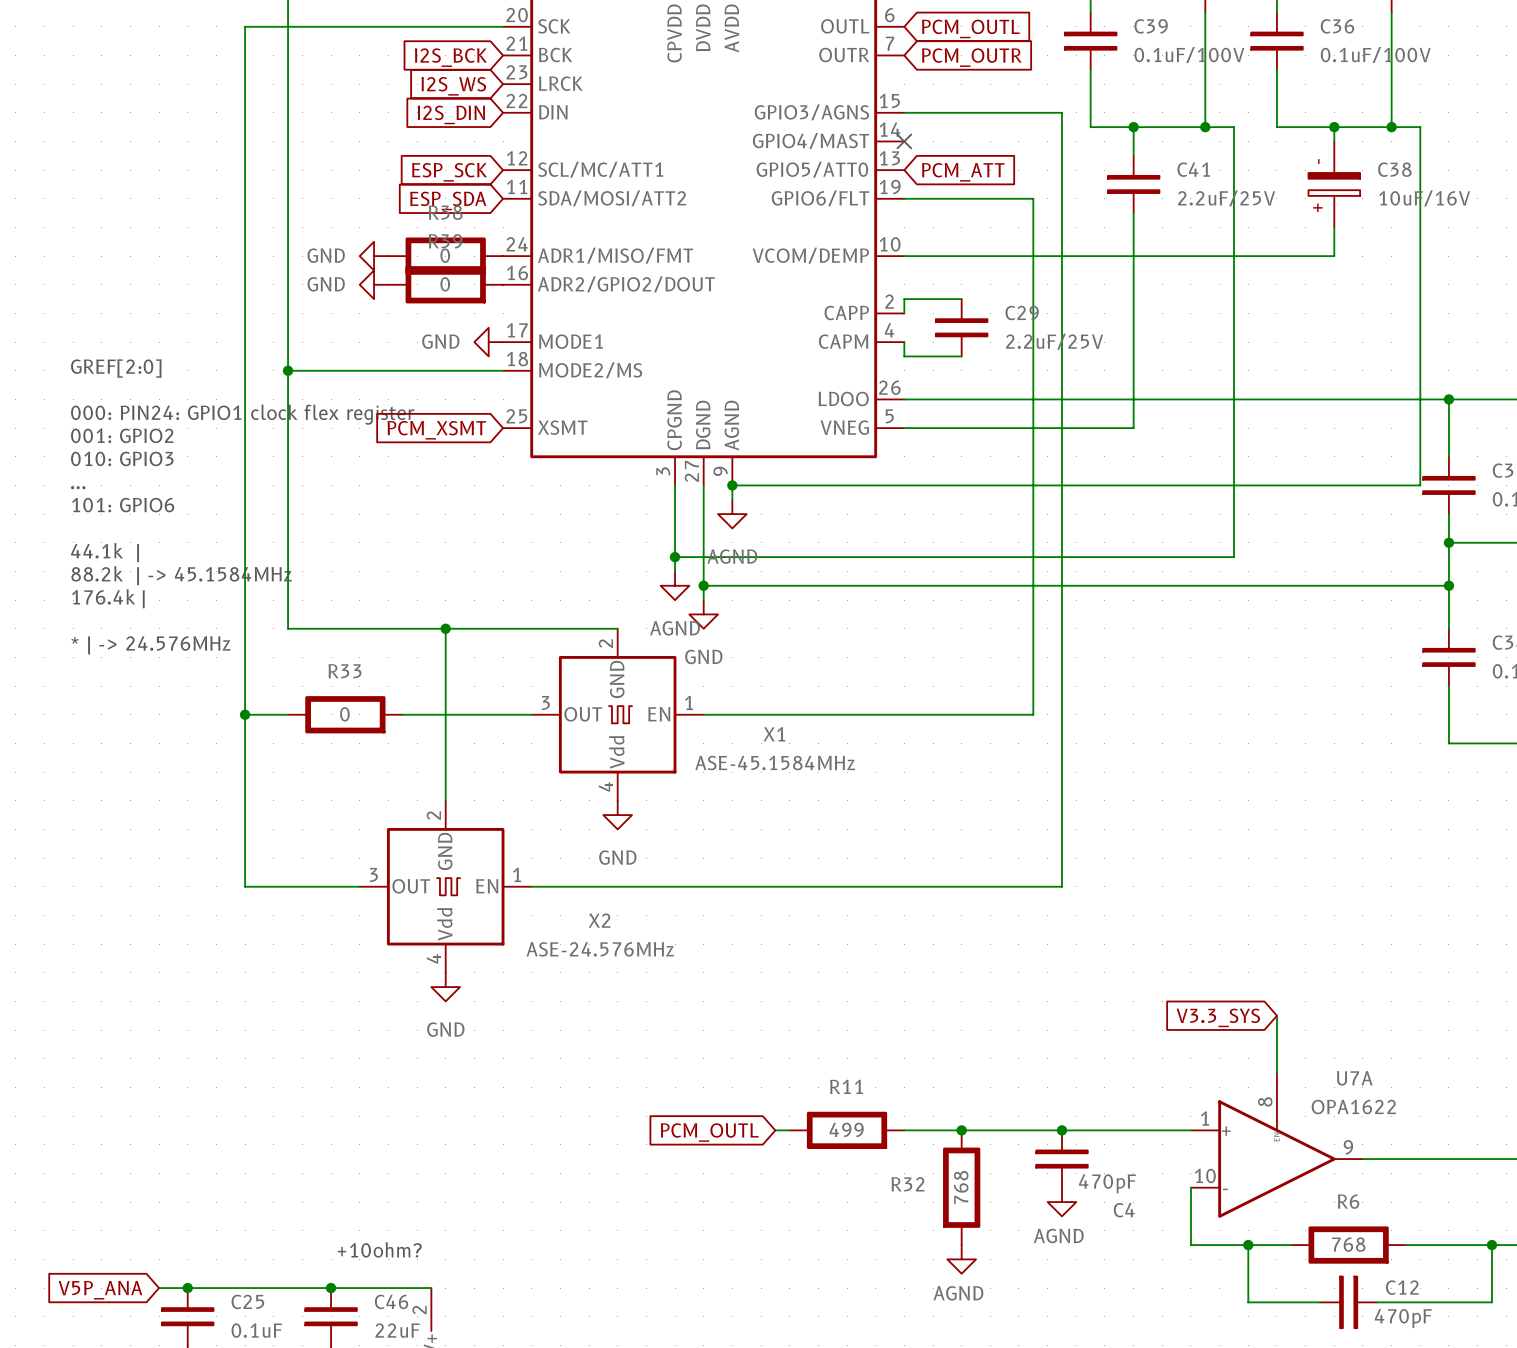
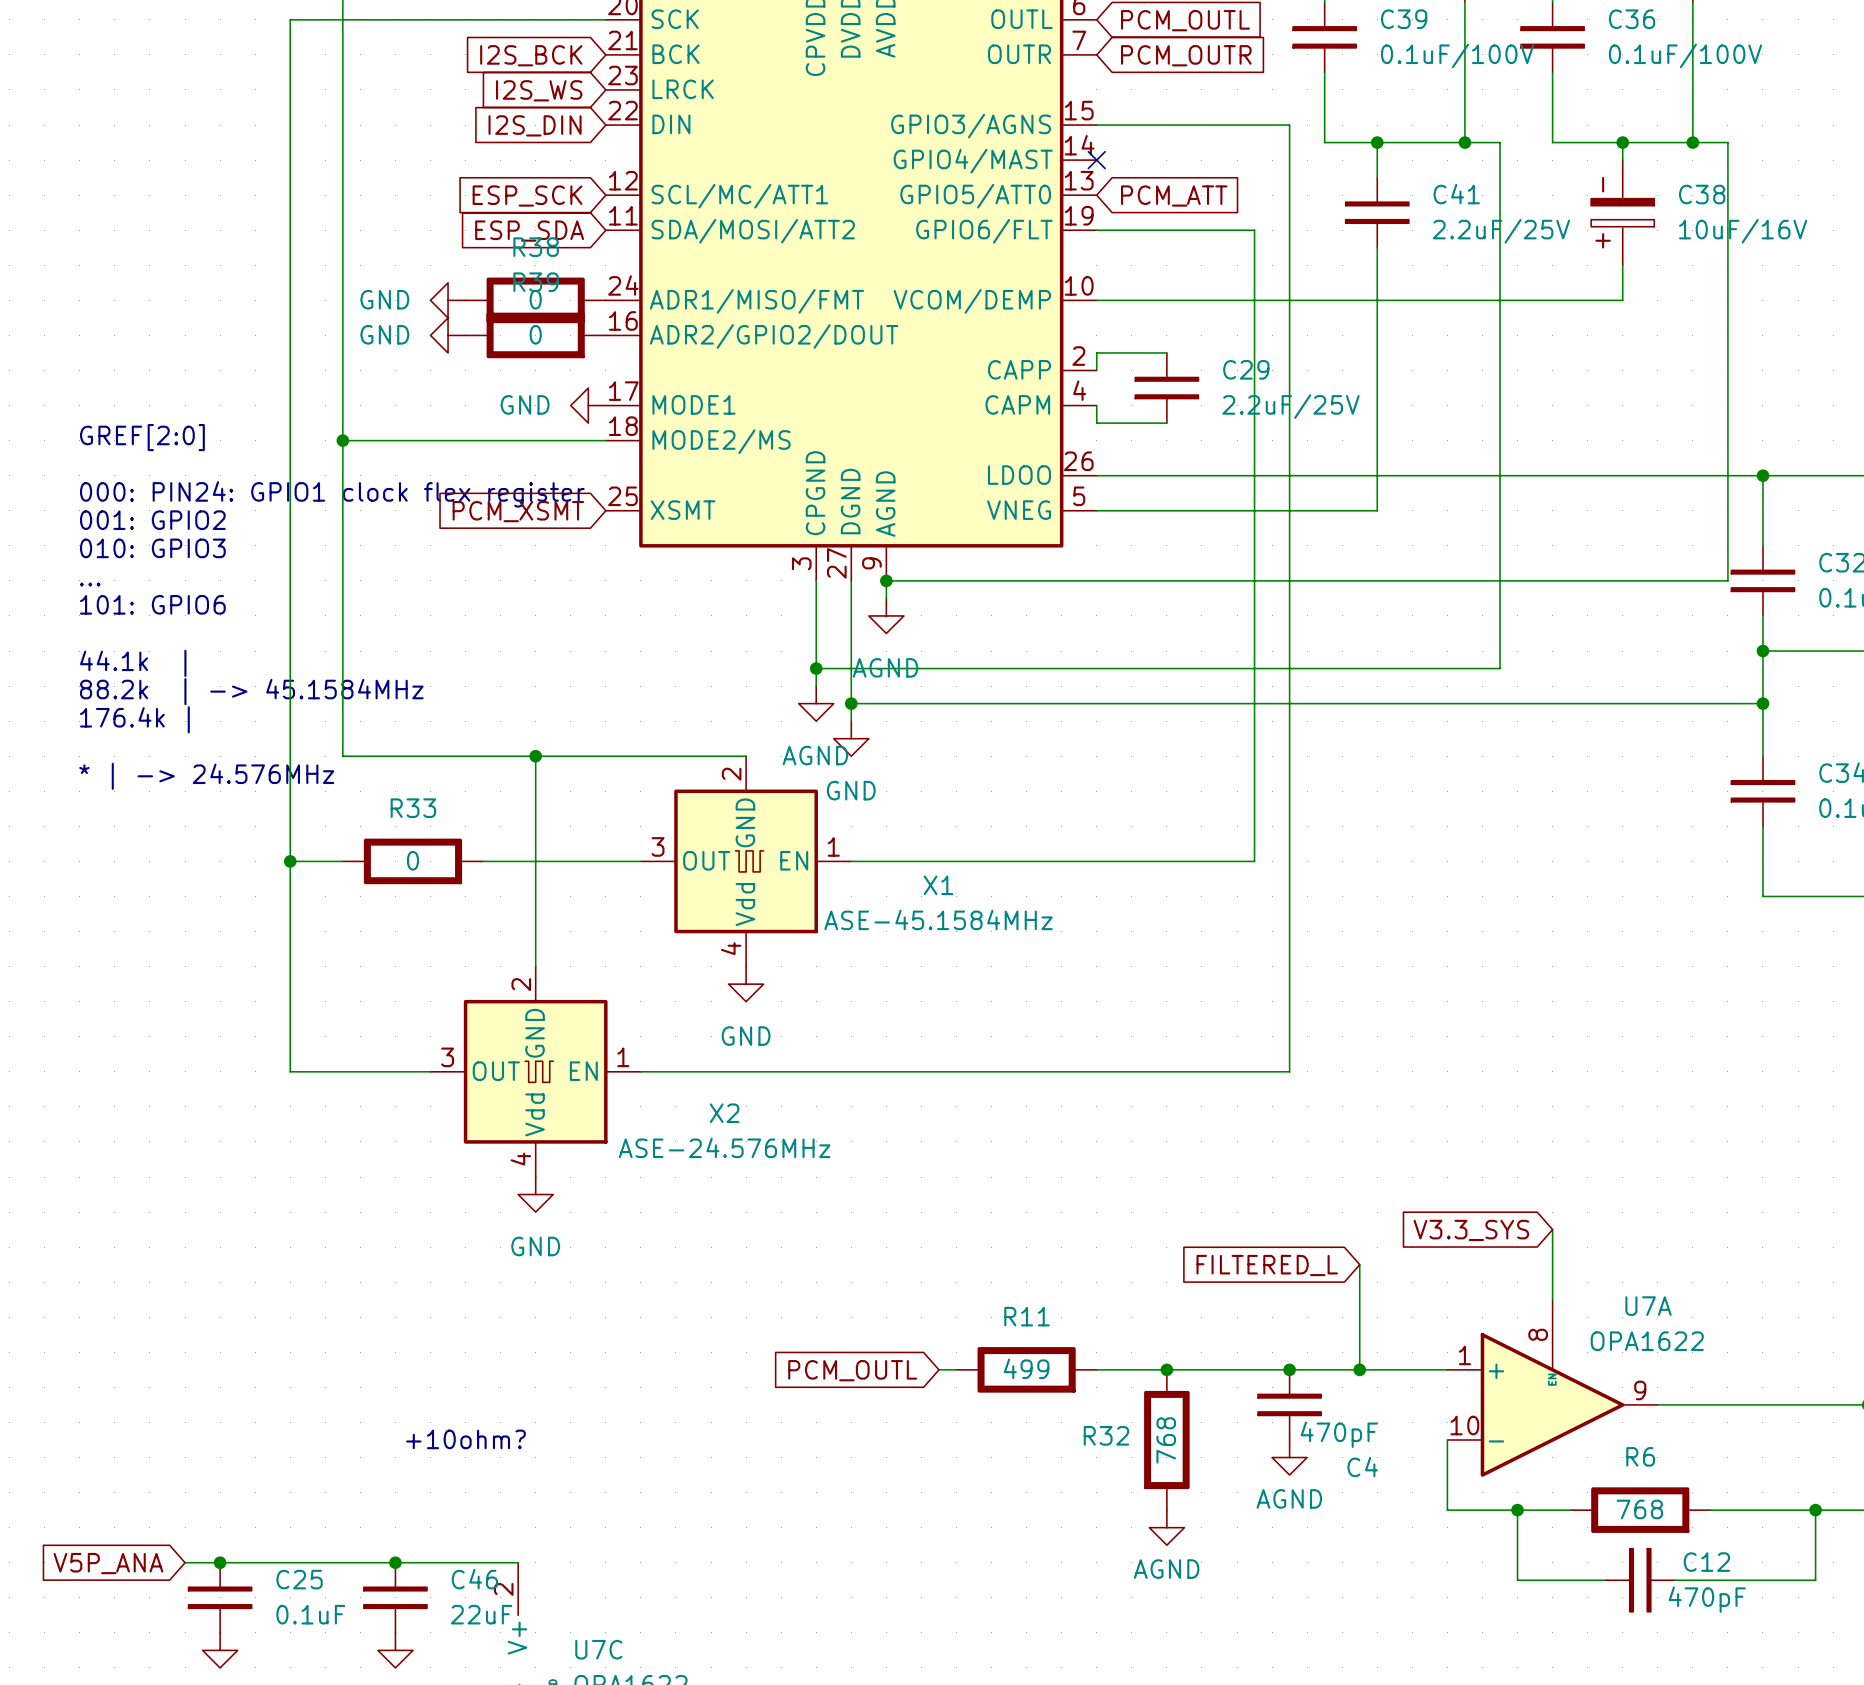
wire: none -> (1359, 1264) (1359, 1369)
global label: none -> FILTERED_L (1267, 1265)
junction: none -> (1359, 1369)
text position: +10ohm? (379, 1249) -> +10ohm? (465, 1439)

